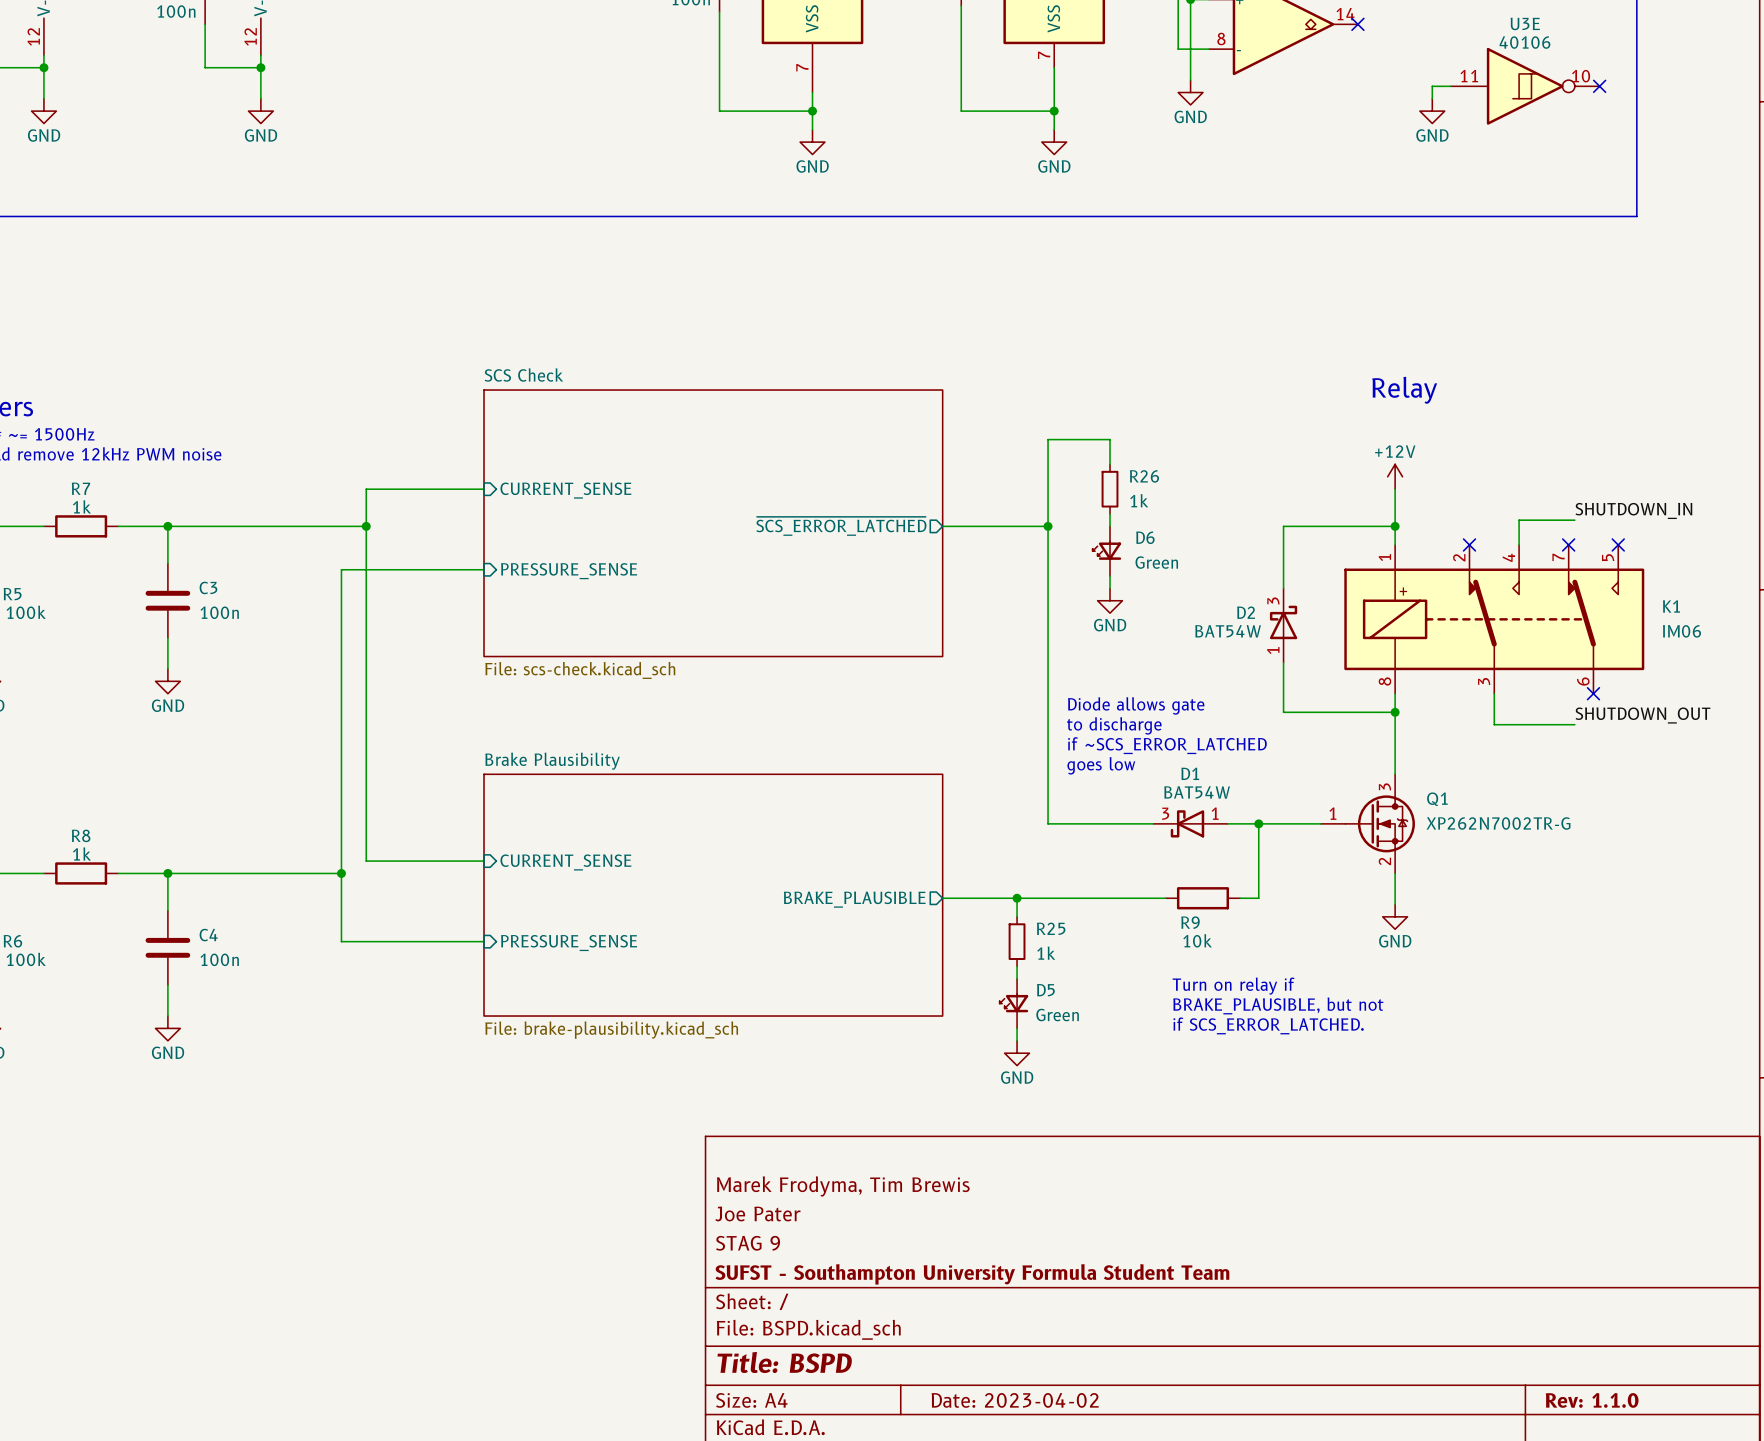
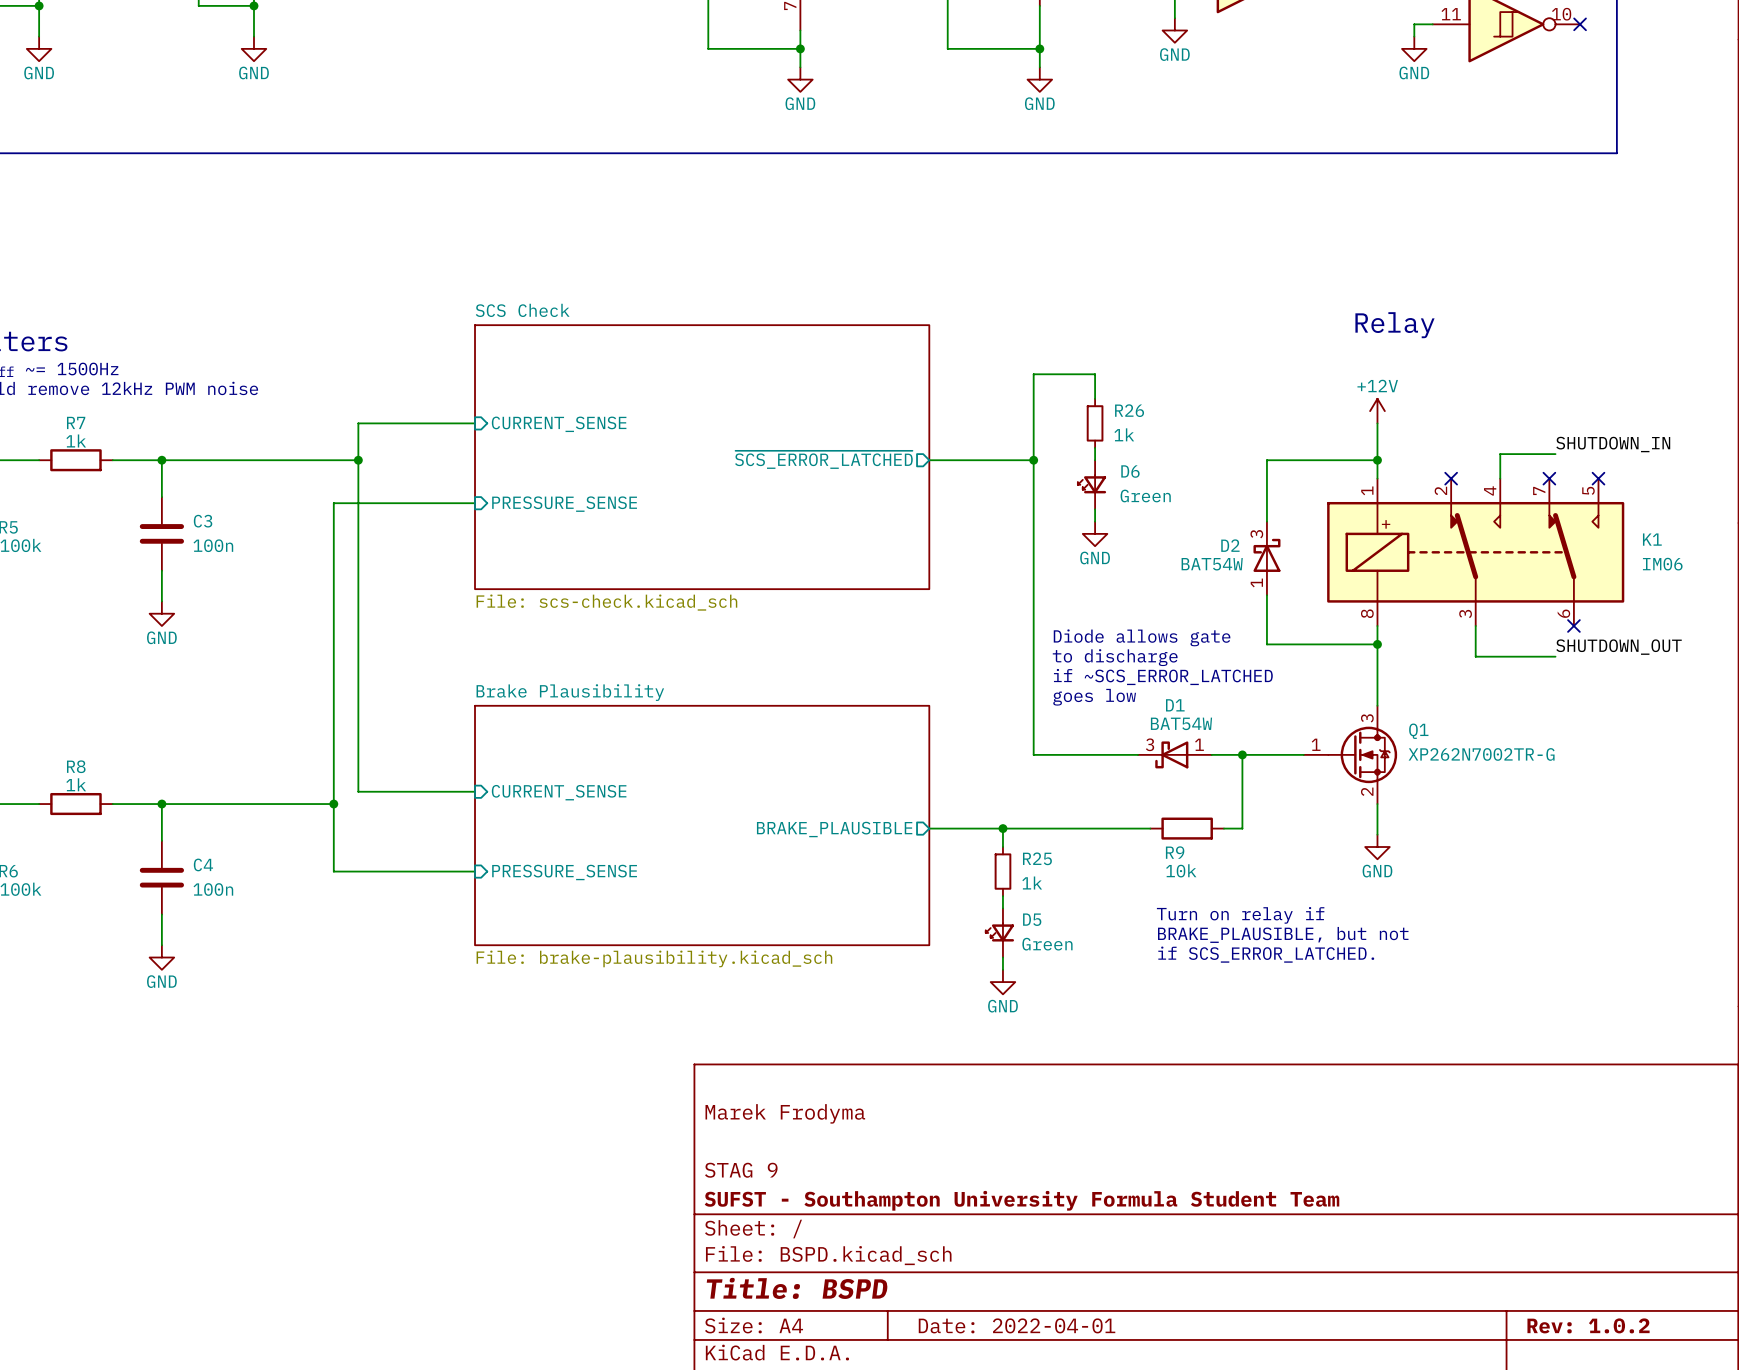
title block: Marek Frodyma, Tim Brewis (843, 1186) -> Marek Frodyma (785, 1113)
title block: Joe Pater (757, 1213) -> none
title block: Date: 2023-04-02 (1015, 1400) -> Date: 2022-04-01 (1017, 1325)
title block: Rev: 1.1.0 (1592, 1400) -> Rev: 1.0.2 (1588, 1325)

